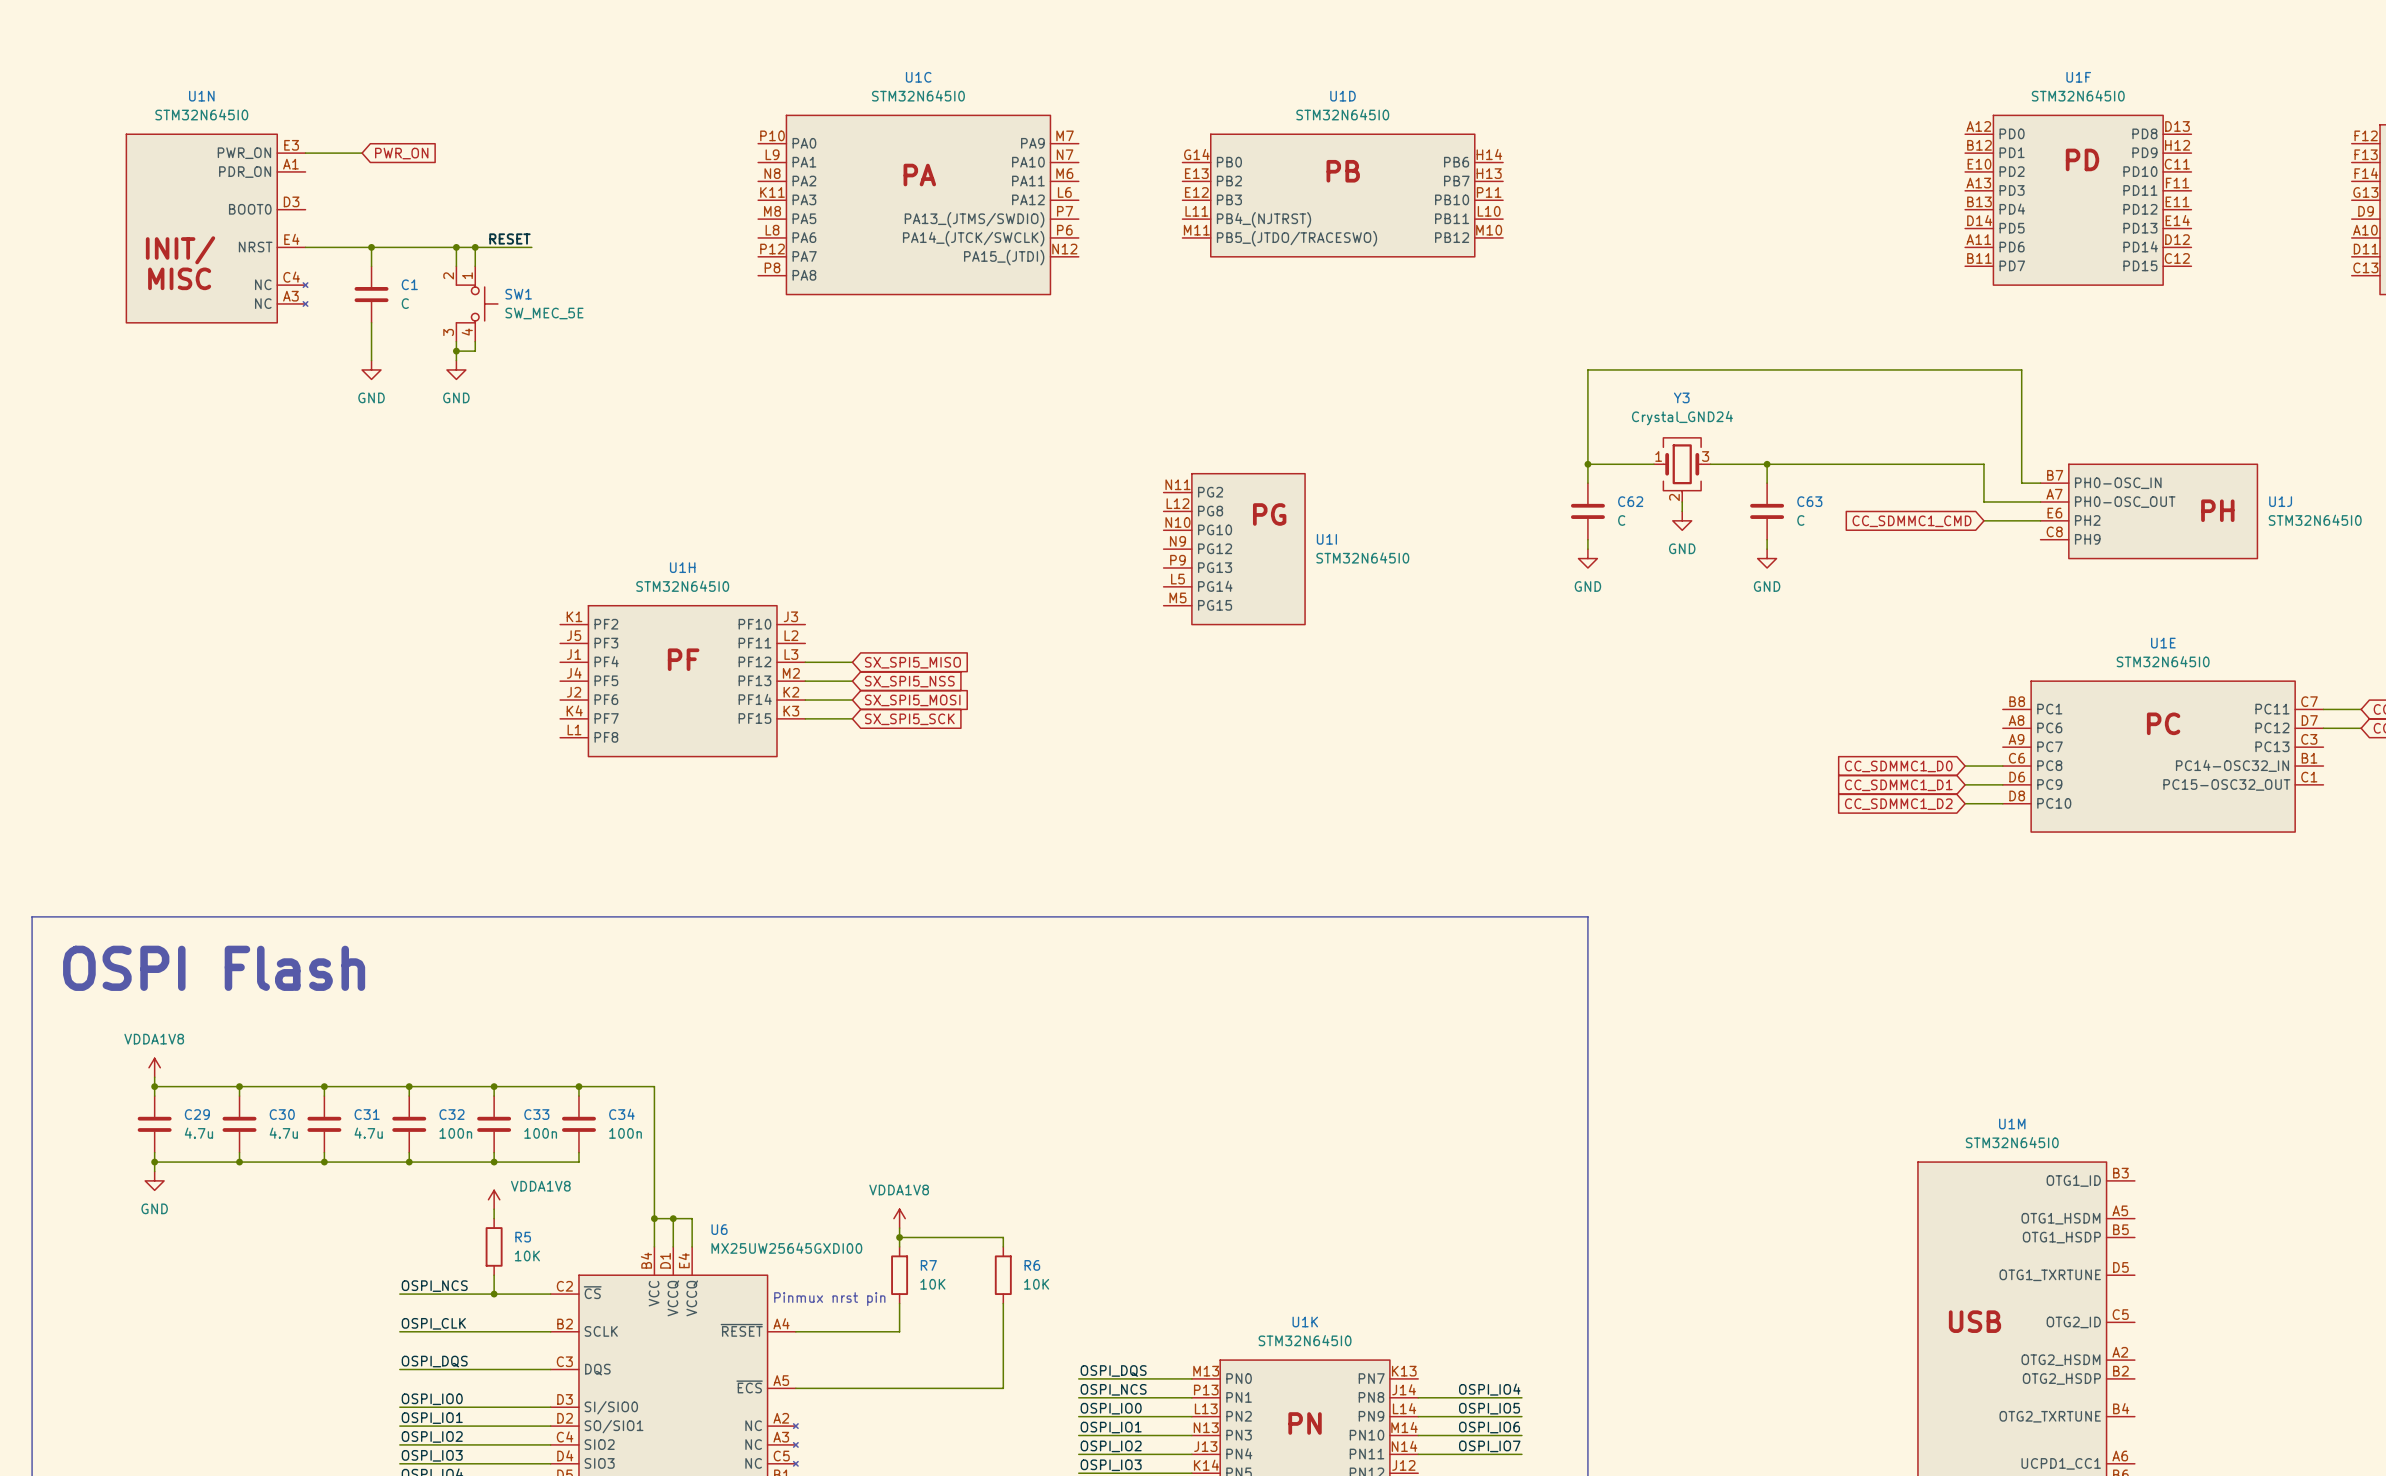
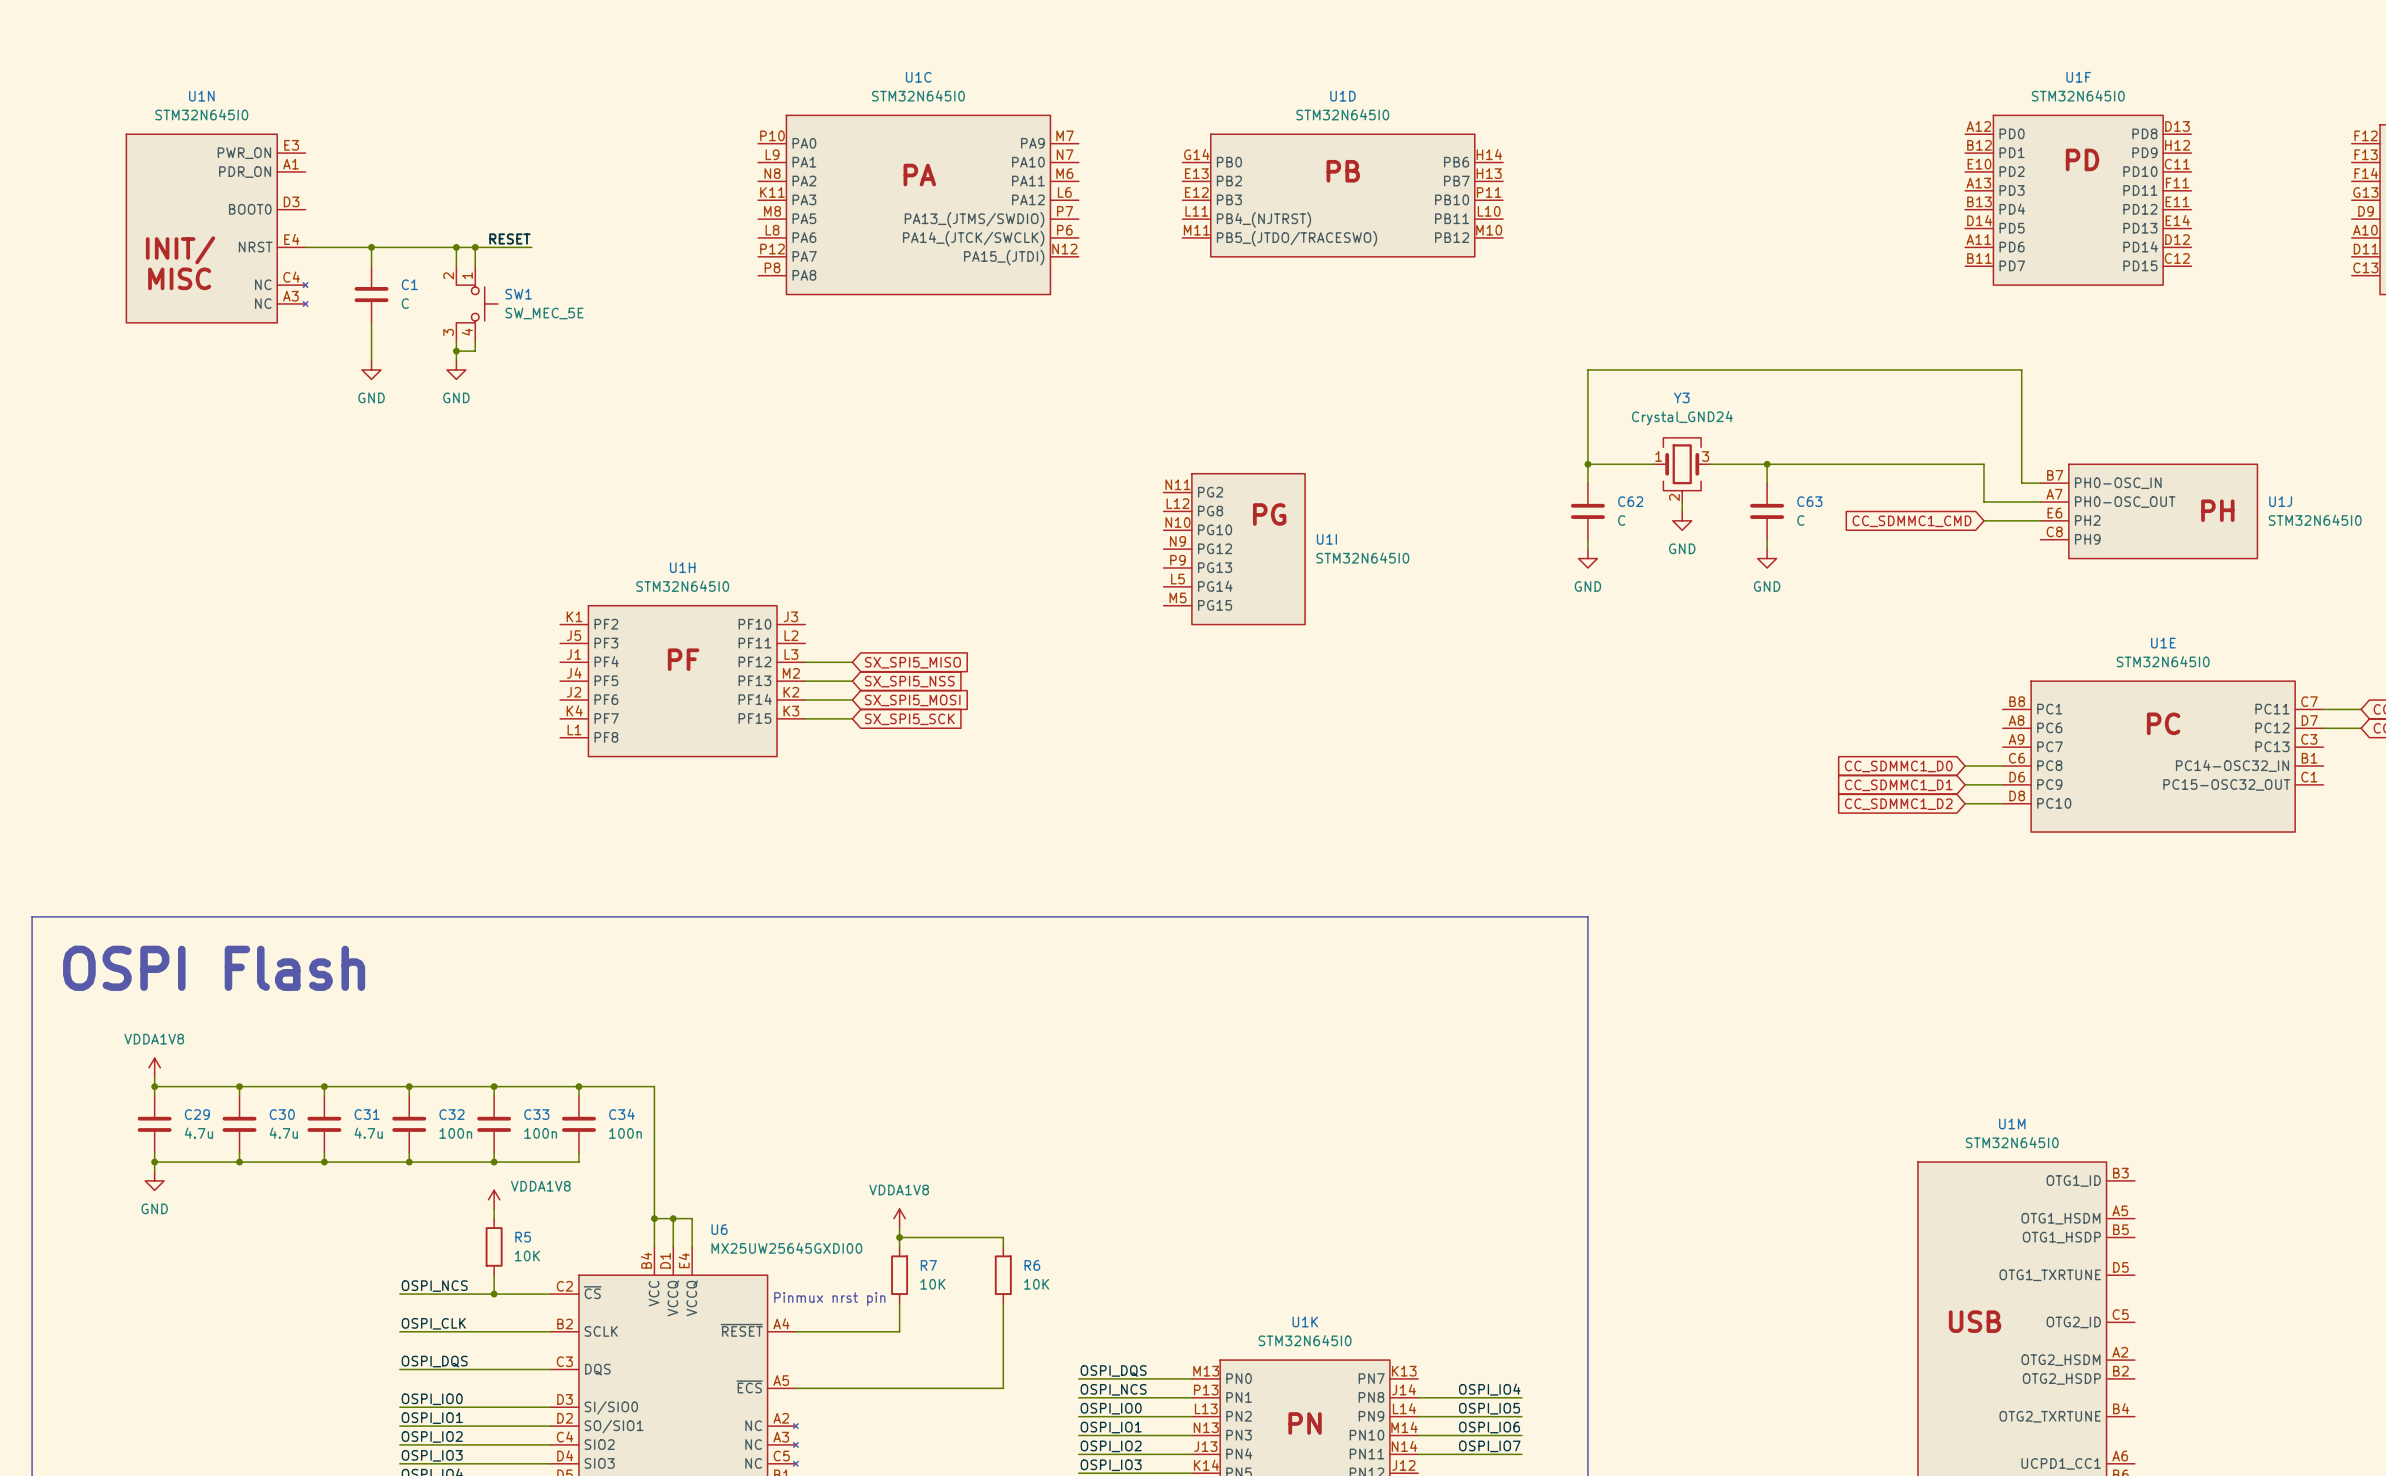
wire: (305, 153) (362, 153) -> none
global label: PWR_ON (401, 153) -> none

